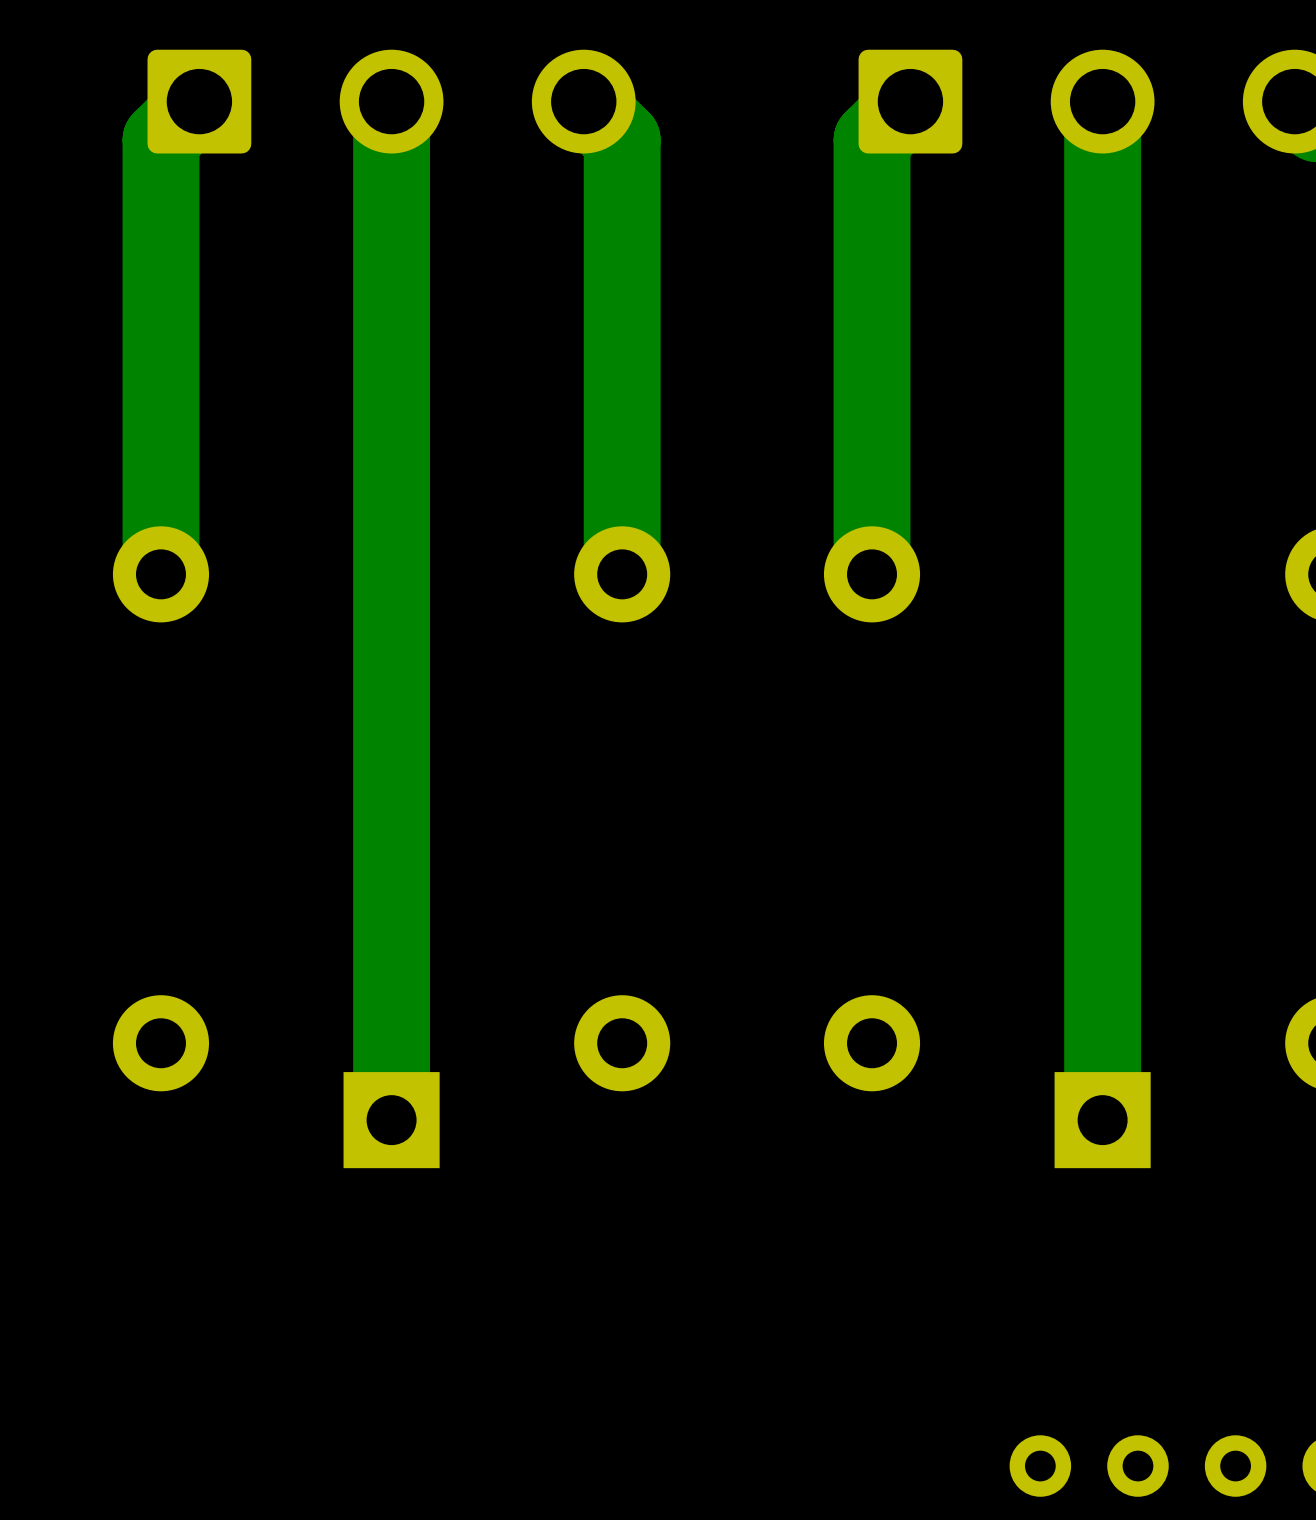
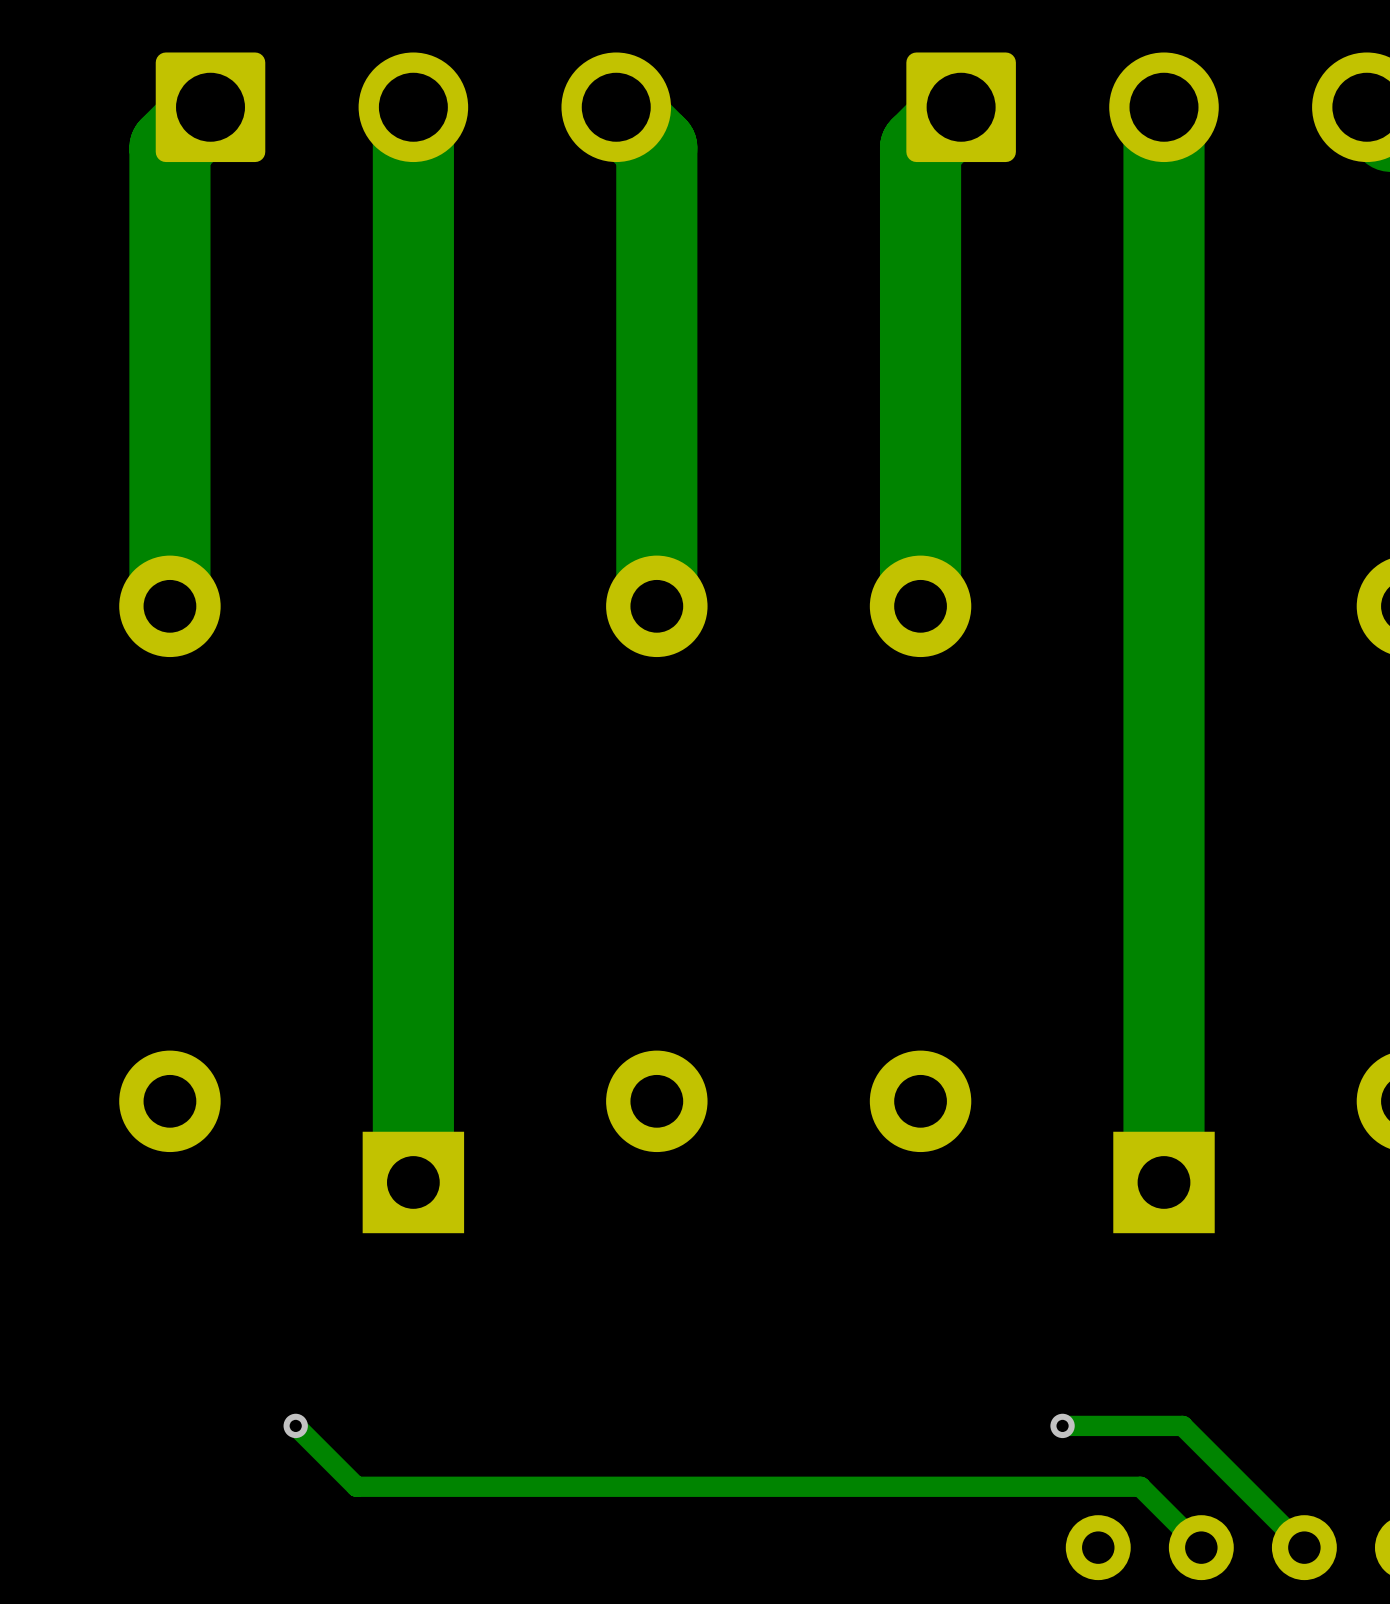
track: none -> (295, 1425) (356, 1486) (1140, 1486) (1201, 1547)
via: none -> (295, 1425)
track: none -> (1062, 1425) (1182, 1425) (1304, 1547)
via: none -> (1062, 1425)

